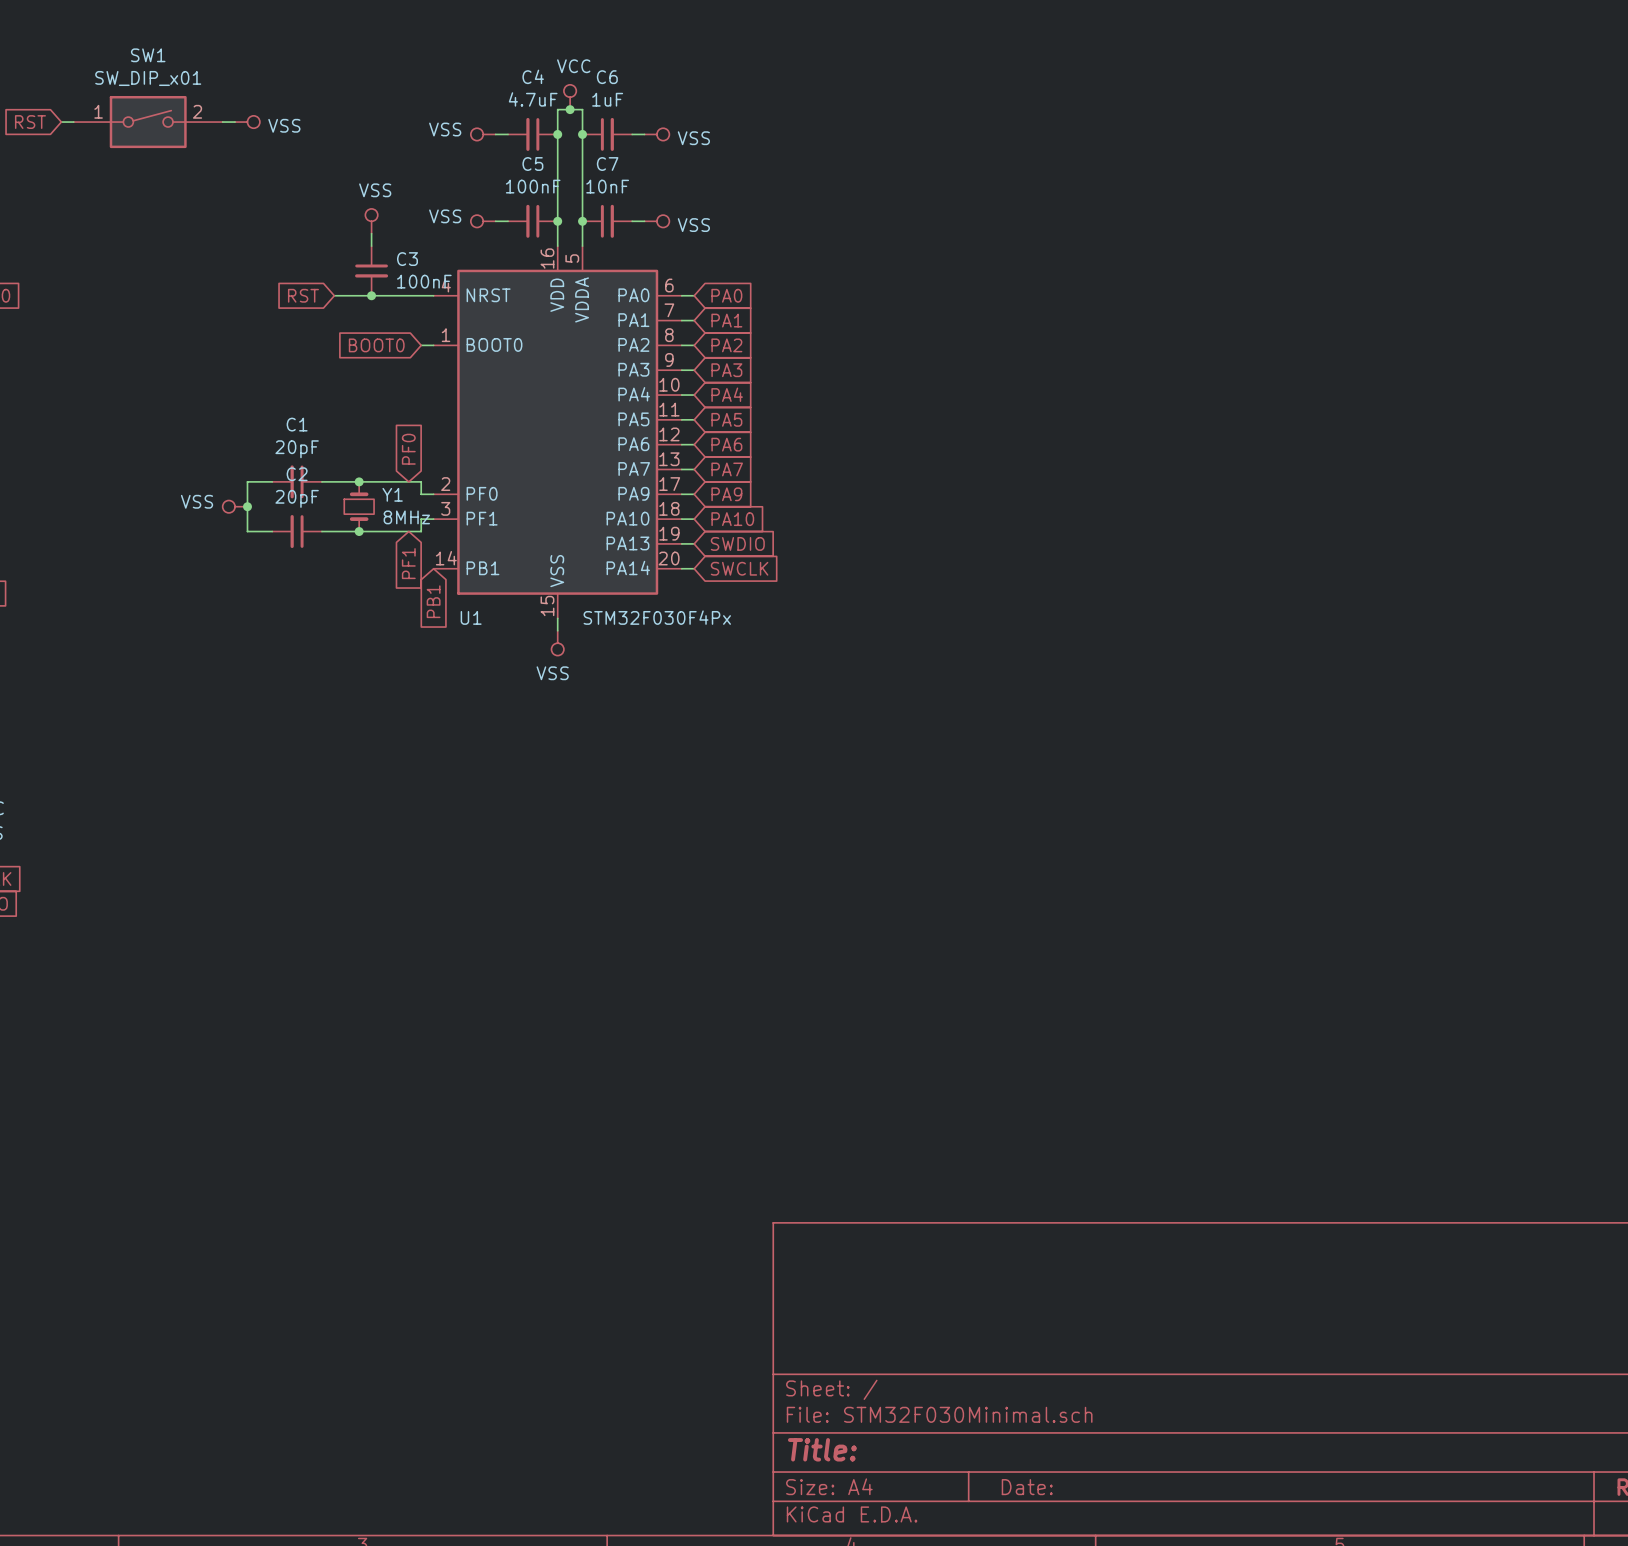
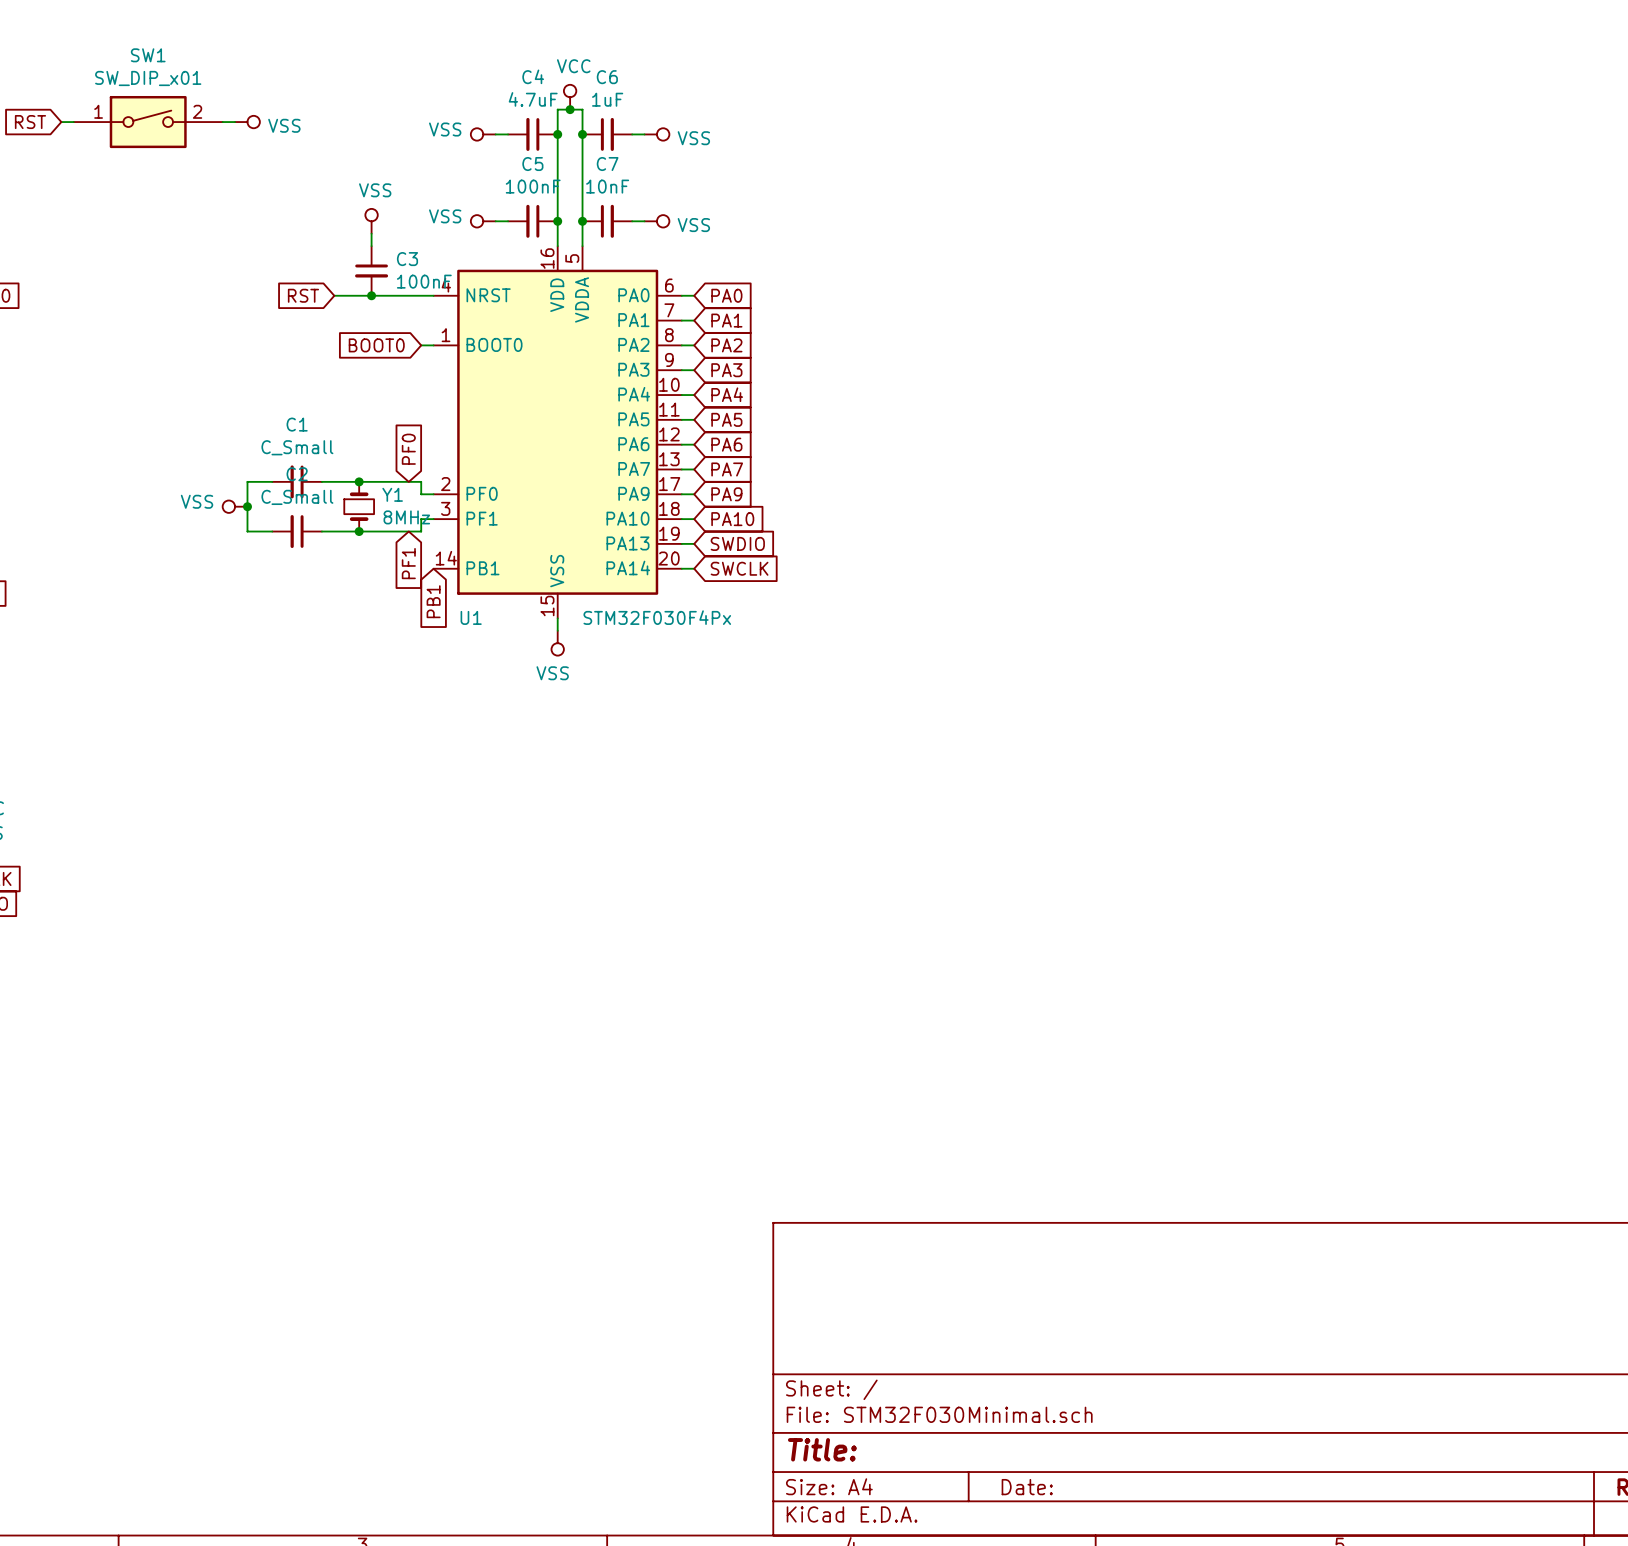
C1 value: 20pF (297, 449) -> C_Small (297, 447)
C2 value: 20pF (297, 498) -> C_Small (297, 497)

